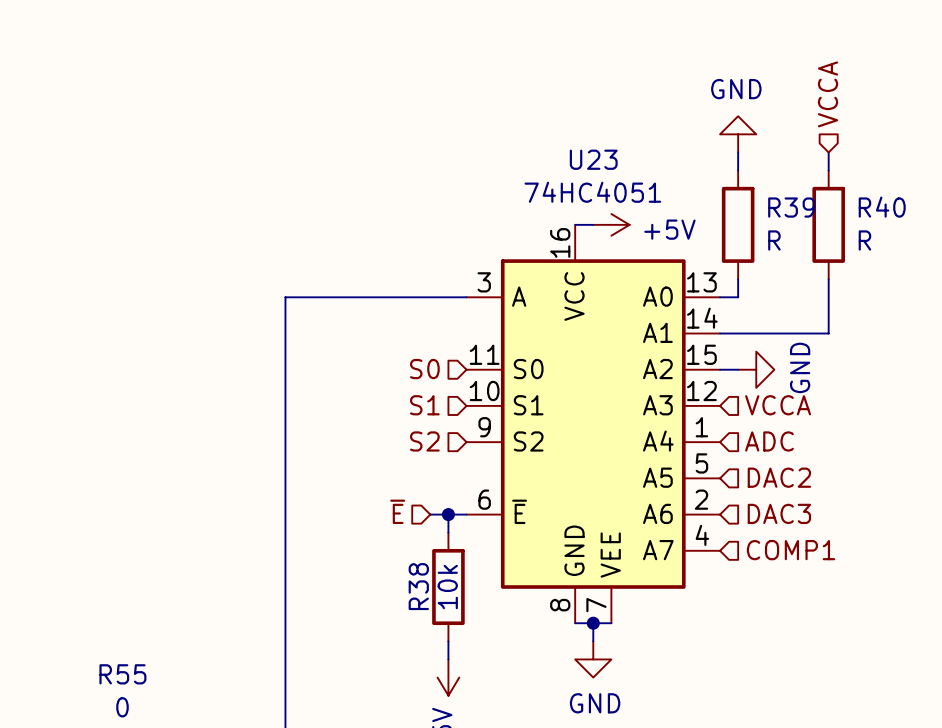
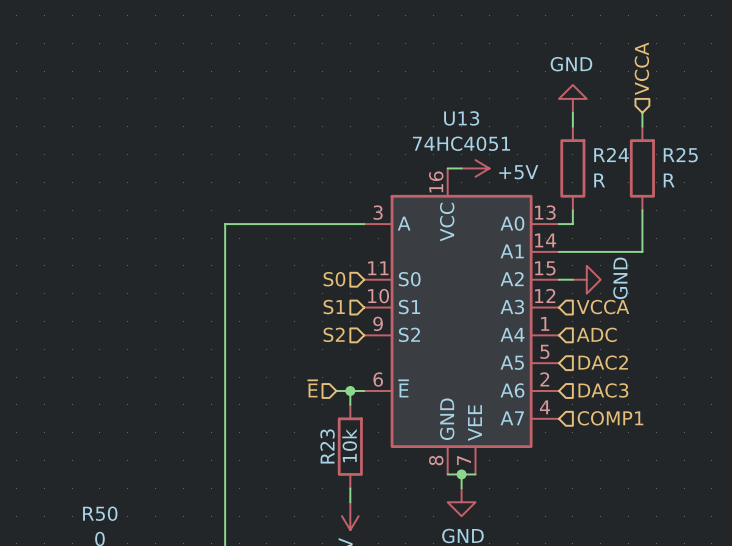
U23 name: U23 (593, 159) -> U13 (461, 118)
R39 name: R39 (791, 207) -> R24 (611, 155)
R40 name: R40 (882, 207) -> R25 (680, 155)
R38 name: R38 (418, 586) -> R23 (327, 446)
R55 name: R55 (122, 674) -> R50 (100, 513)

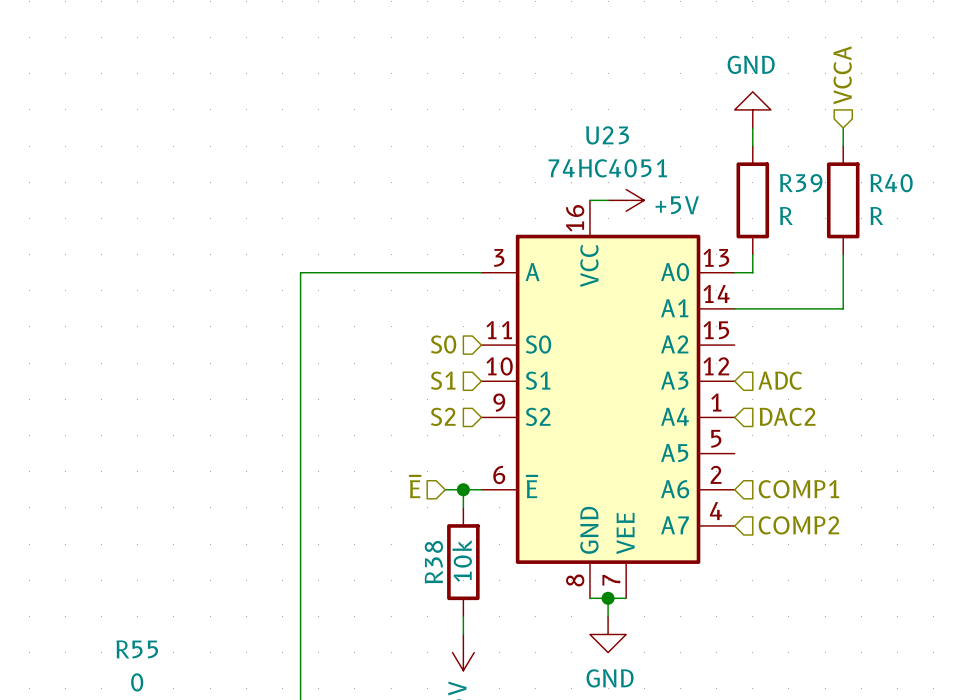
U13 name: U13 (461, 118) -> U23 (607, 135)
R24 name: R24 (611, 155) -> R39 (801, 183)
R25 name: R25 (680, 155) -> R40 (891, 183)
wire: (558, 279) (572, 279) -> none
power symbol: GND (586, 279) -> none
hierarchical label: VCCA (602, 307) -> ADC (780, 380)
hierarchical label: ADC (596, 334) -> DAC2 (787, 416)
hierarchical label: DAC2 (603, 362) -> none
hierarchical label: DAC3 (603, 390) -> COMP1 (798, 489)
hierarchical label: COMP1 (610, 418) -> COMP2 (798, 525)
R23 name: R23 (327, 446) -> R38 (433, 562)
R50 name: R50 (100, 513) -> R55 (137, 649)

